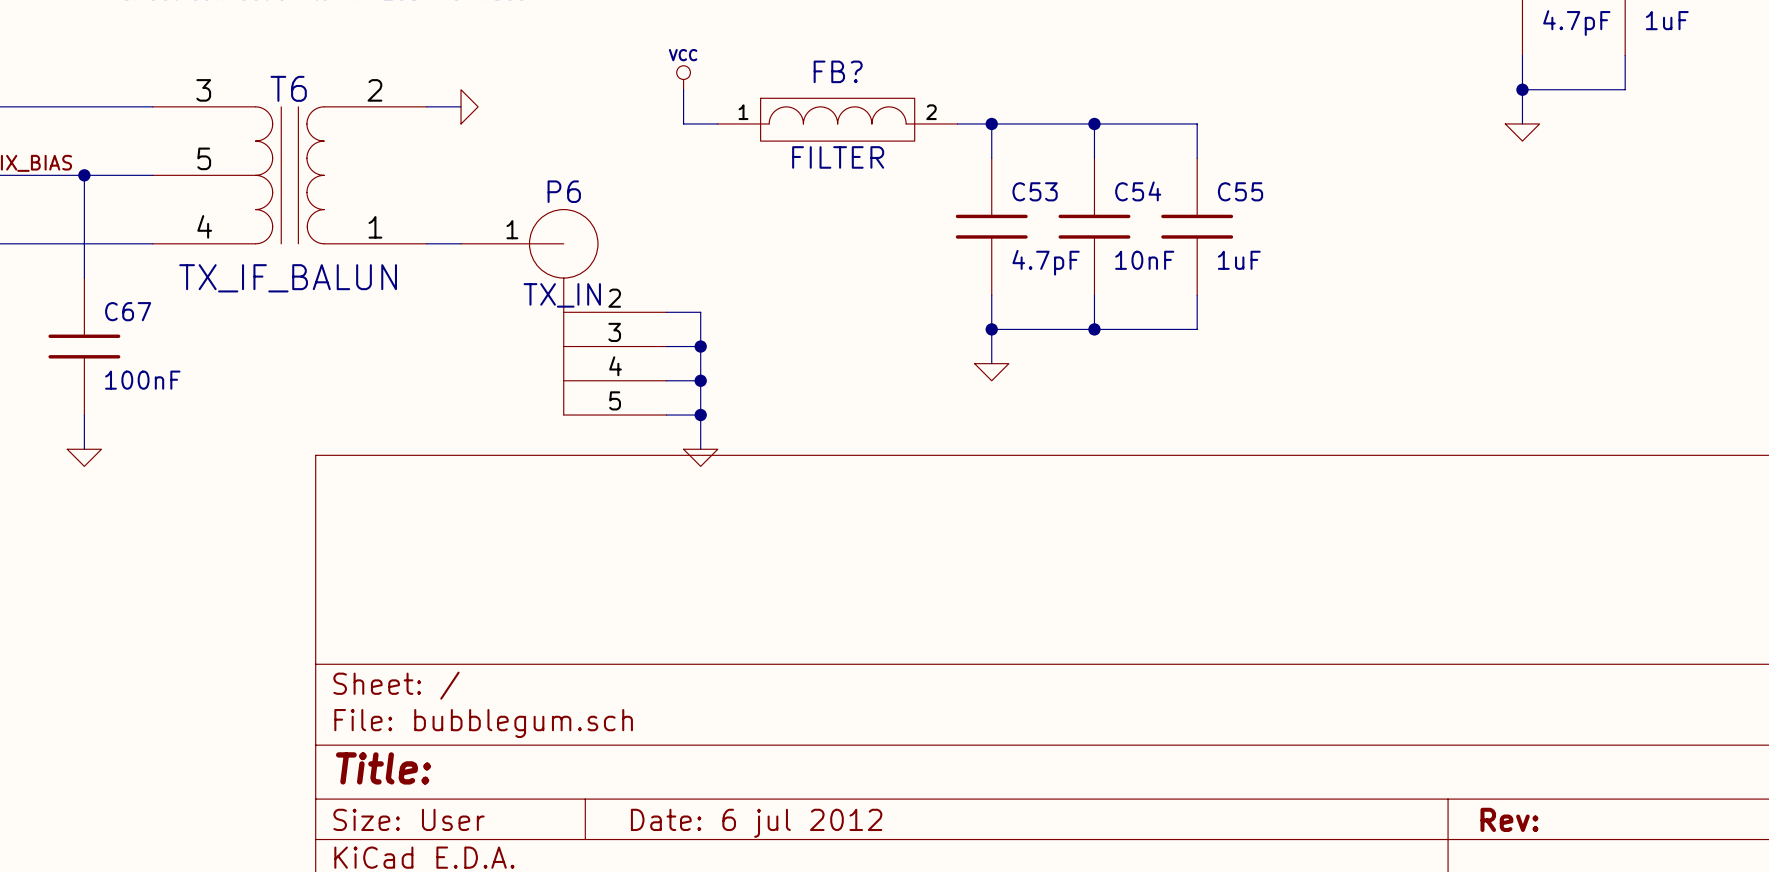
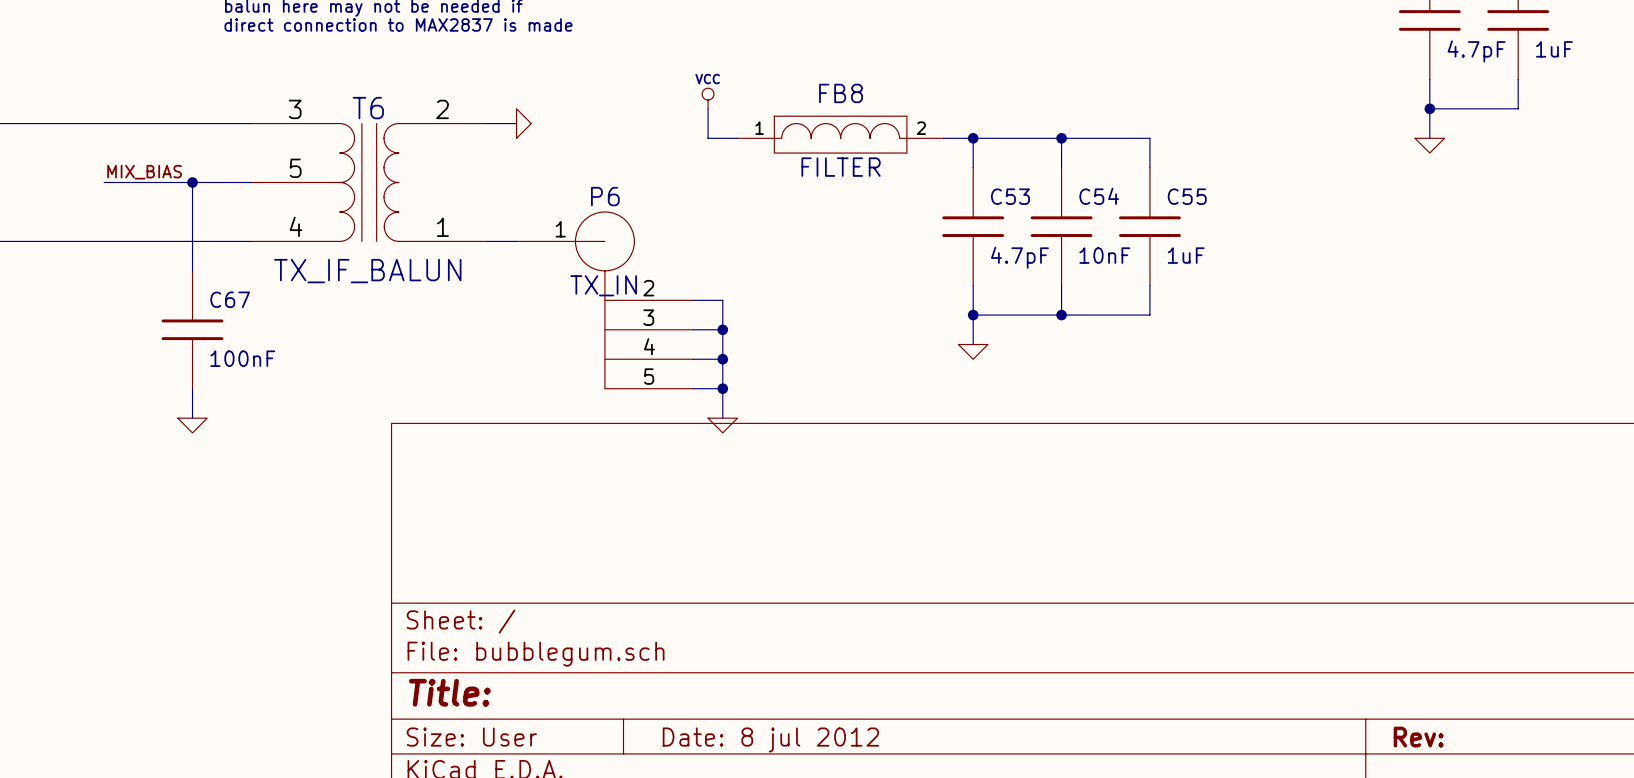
FB? name: FB? (838, 71) -> FB8 (841, 93)
title block: Date: 6 jul 2012 (756, 823) -> Date: 8 jul 2012 (770, 739)

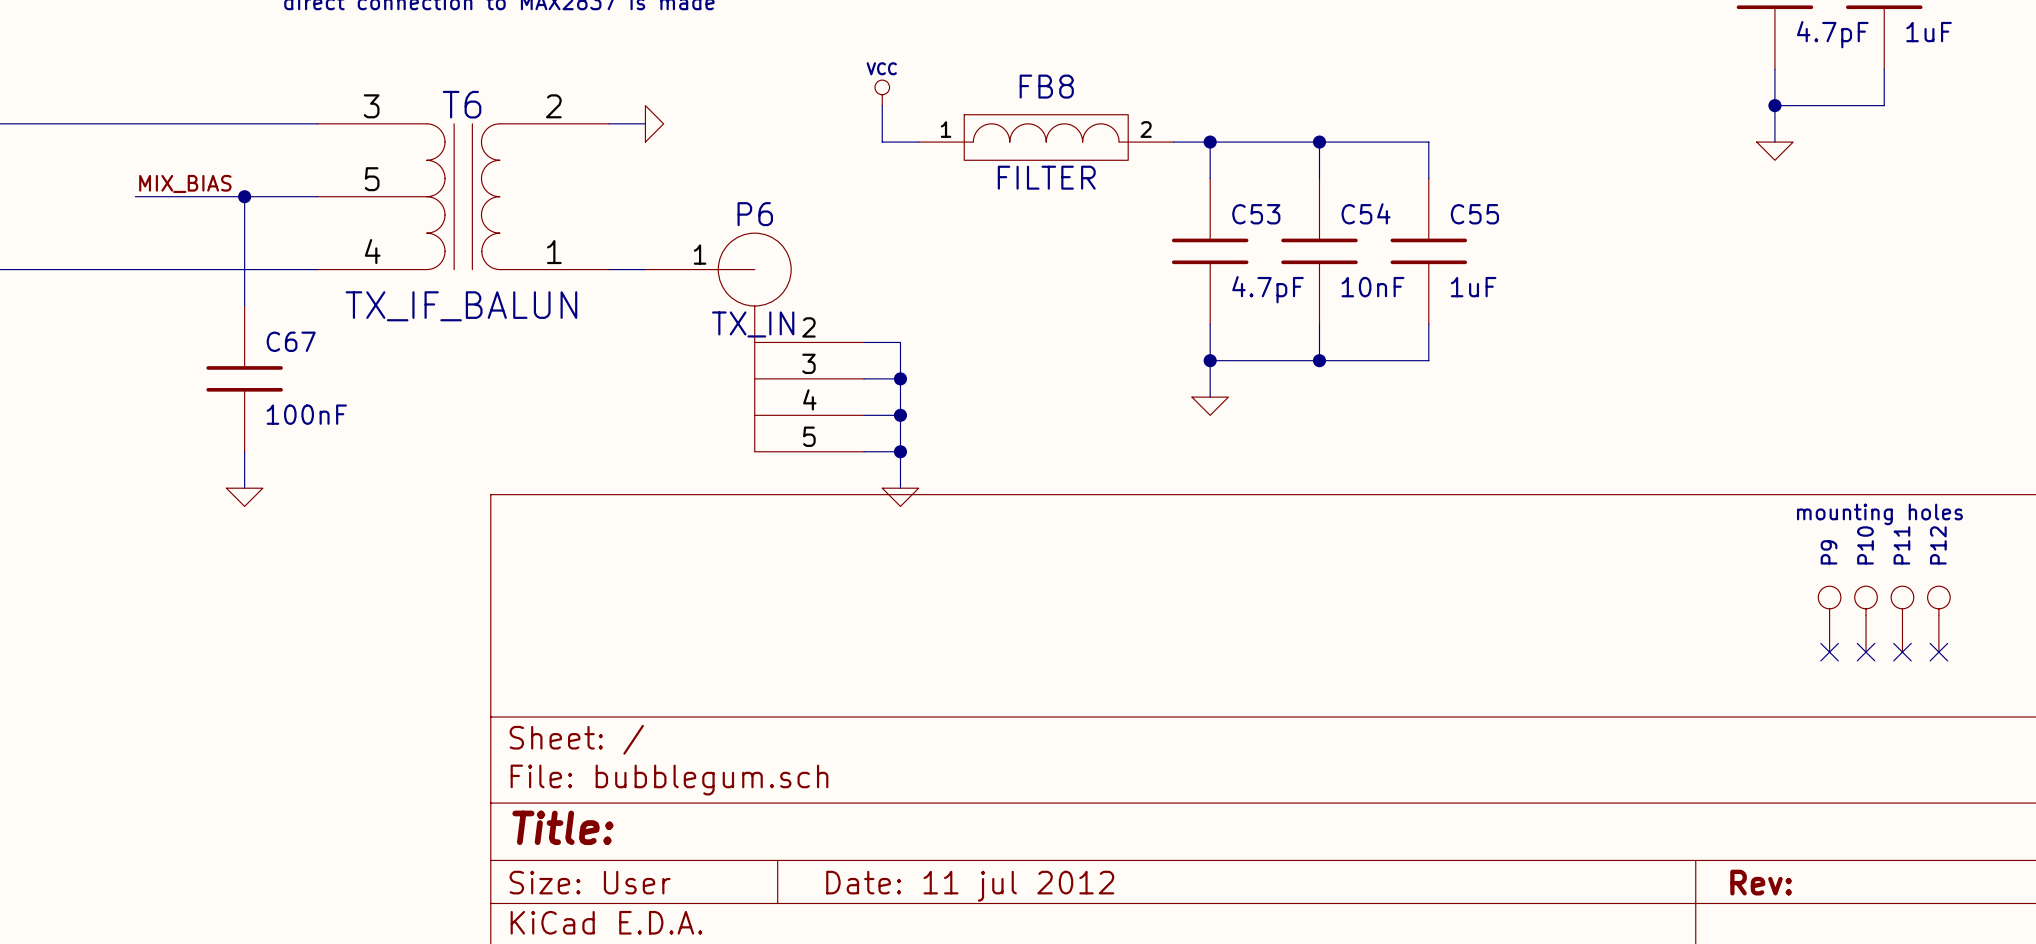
text: none -> mounting holes (1879, 514)
P9: none -> (1829, 619)
P10: none -> (1866, 619)
P11: none -> (1902, 619)
P12: none -> (1938, 619)
no-connect mark: none -> (1829, 652)
no-connect mark: none -> (1866, 652)
no-connect mark: none -> (1902, 652)
no-connect mark: none -> (1938, 652)
title block: Date: 8 jul 2012 (770, 739) -> Date: 11 jul 2012 (970, 886)

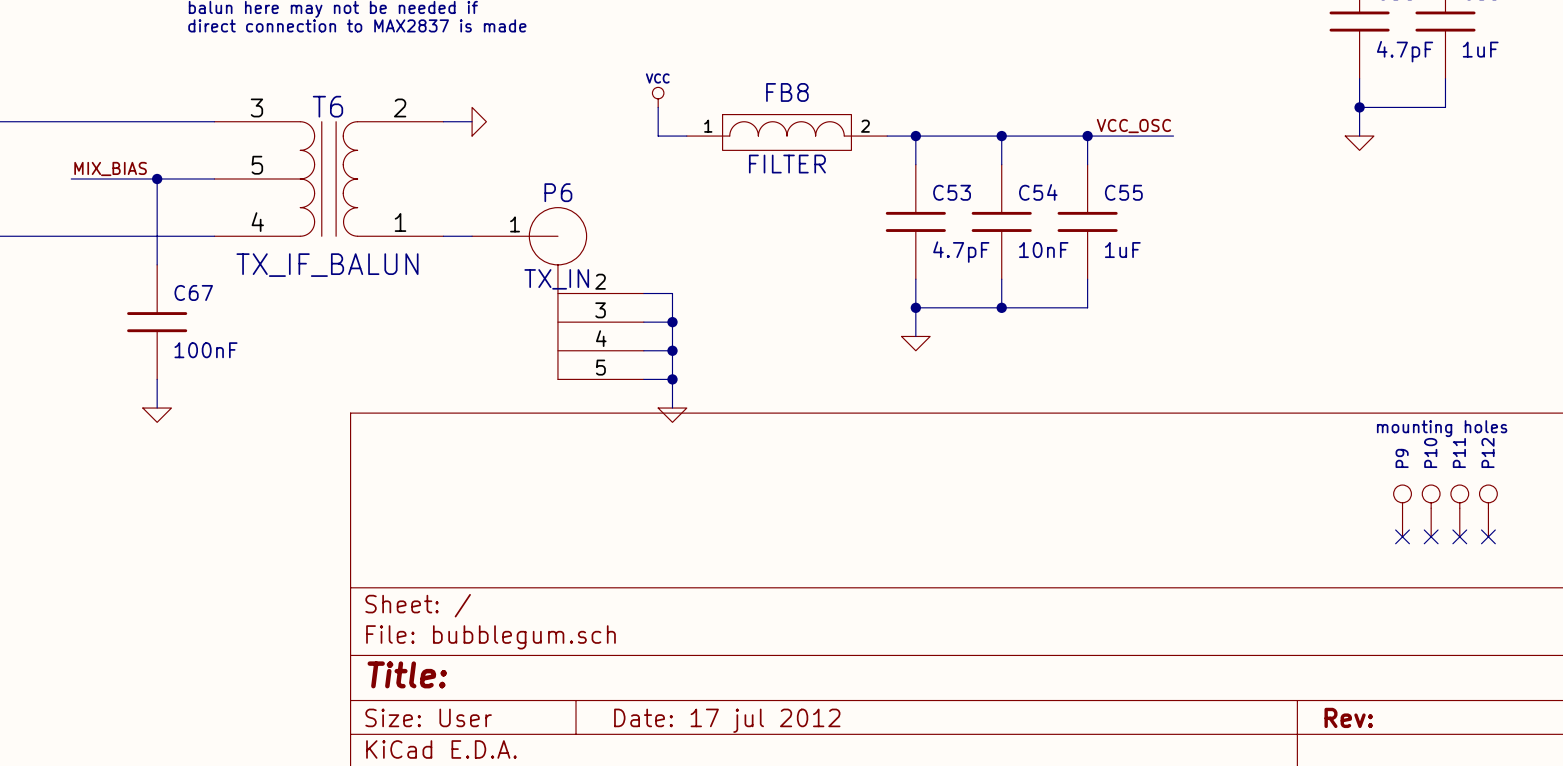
label: none -> VCC_OSC (1133, 126)
wire: none -> (1087, 136) (1173, 136)
junction: none -> (1087, 136)
title block: Date: 11 jul 2012 (970, 886) -> Date: 17 jul 2012 (727, 720)

